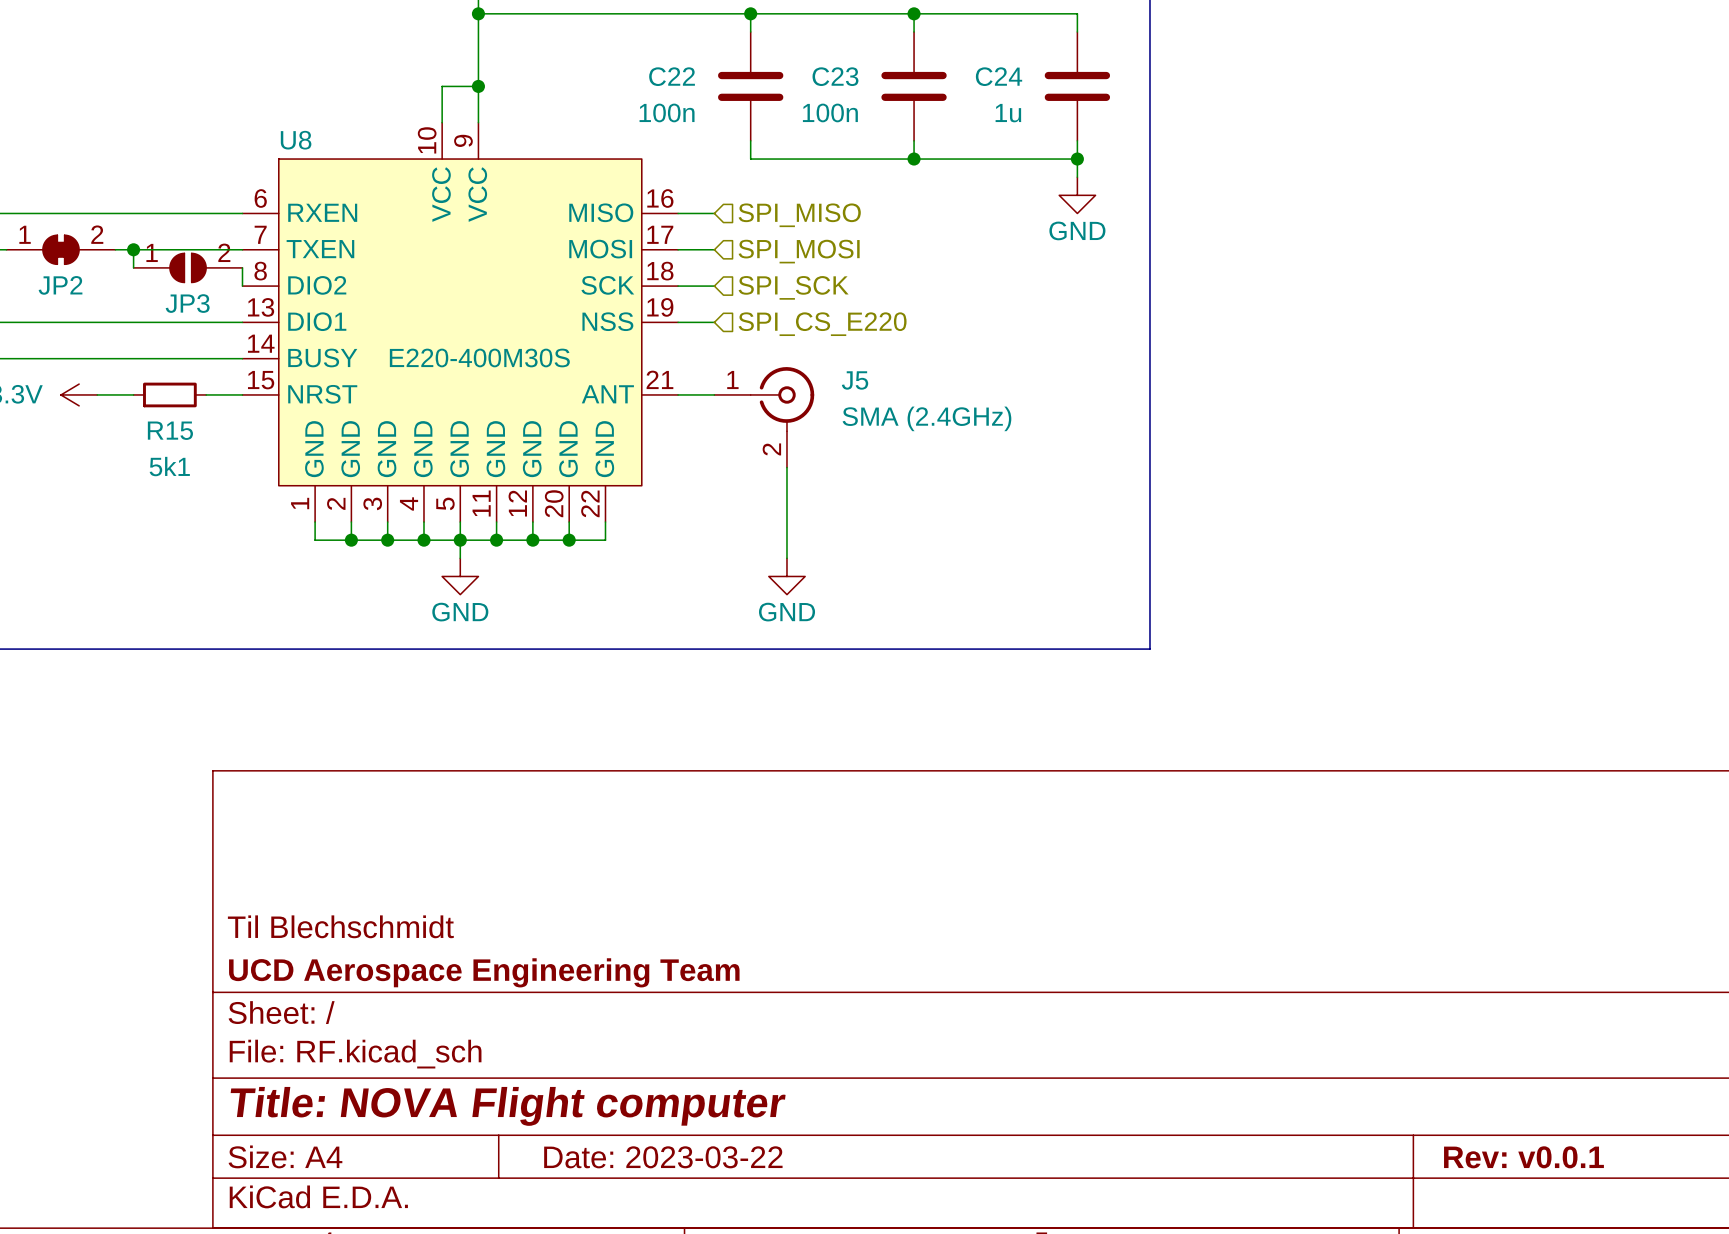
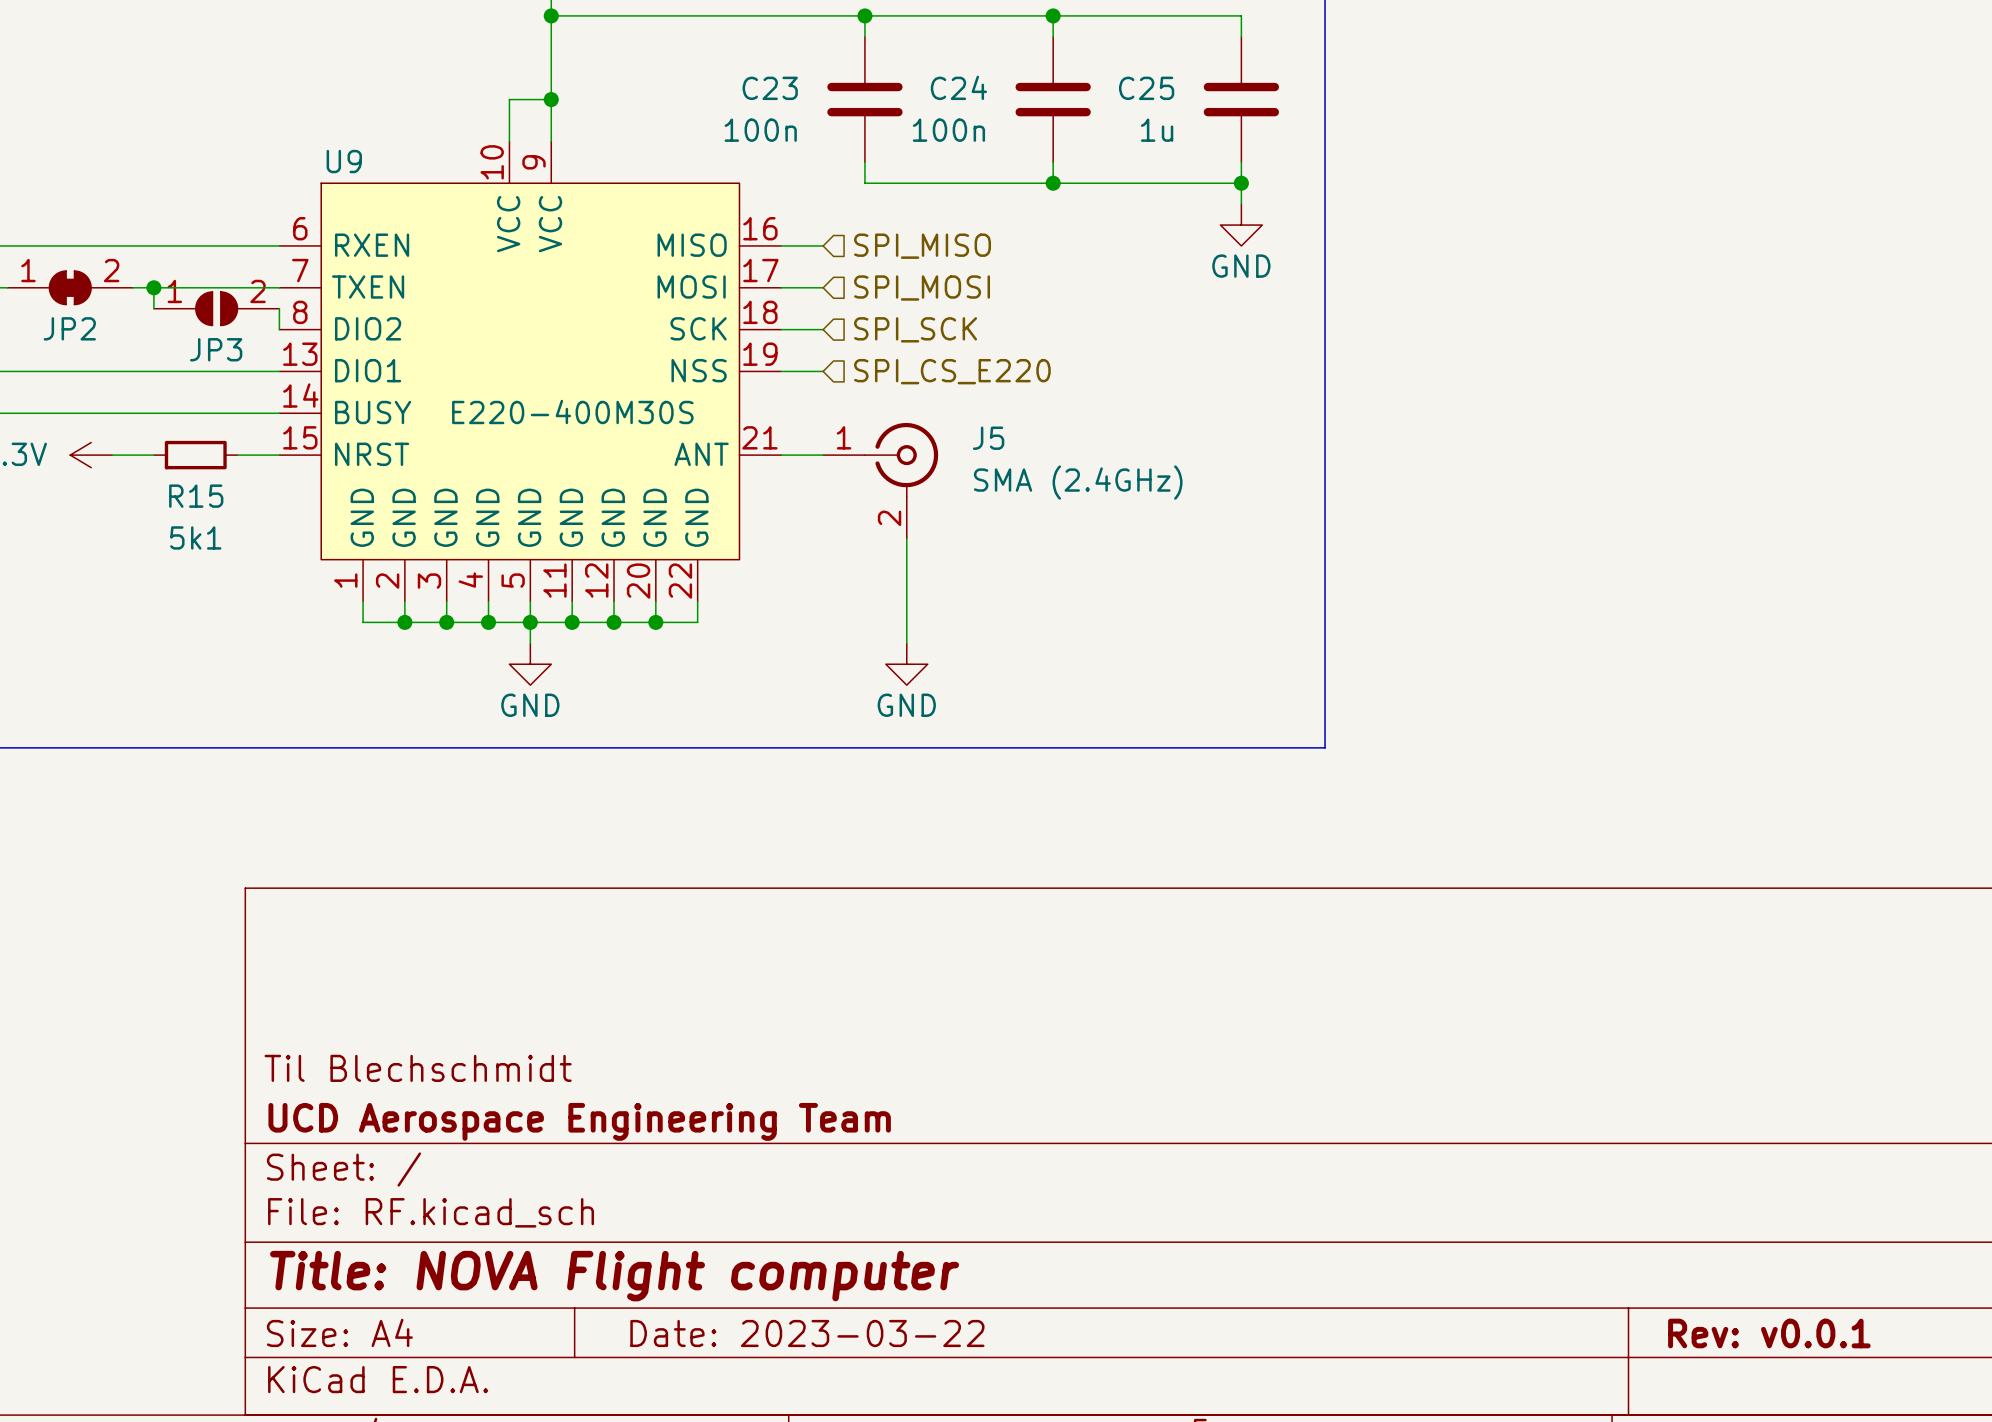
C22 name: C22 (672, 76) -> C23 (770, 88)
C23 name: C23 (835, 76) -> C24 (958, 87)
C24 name: C24 (999, 76) -> C25 (1146, 88)
U8 name: U8 (296, 140) -> U9 (344, 161)

